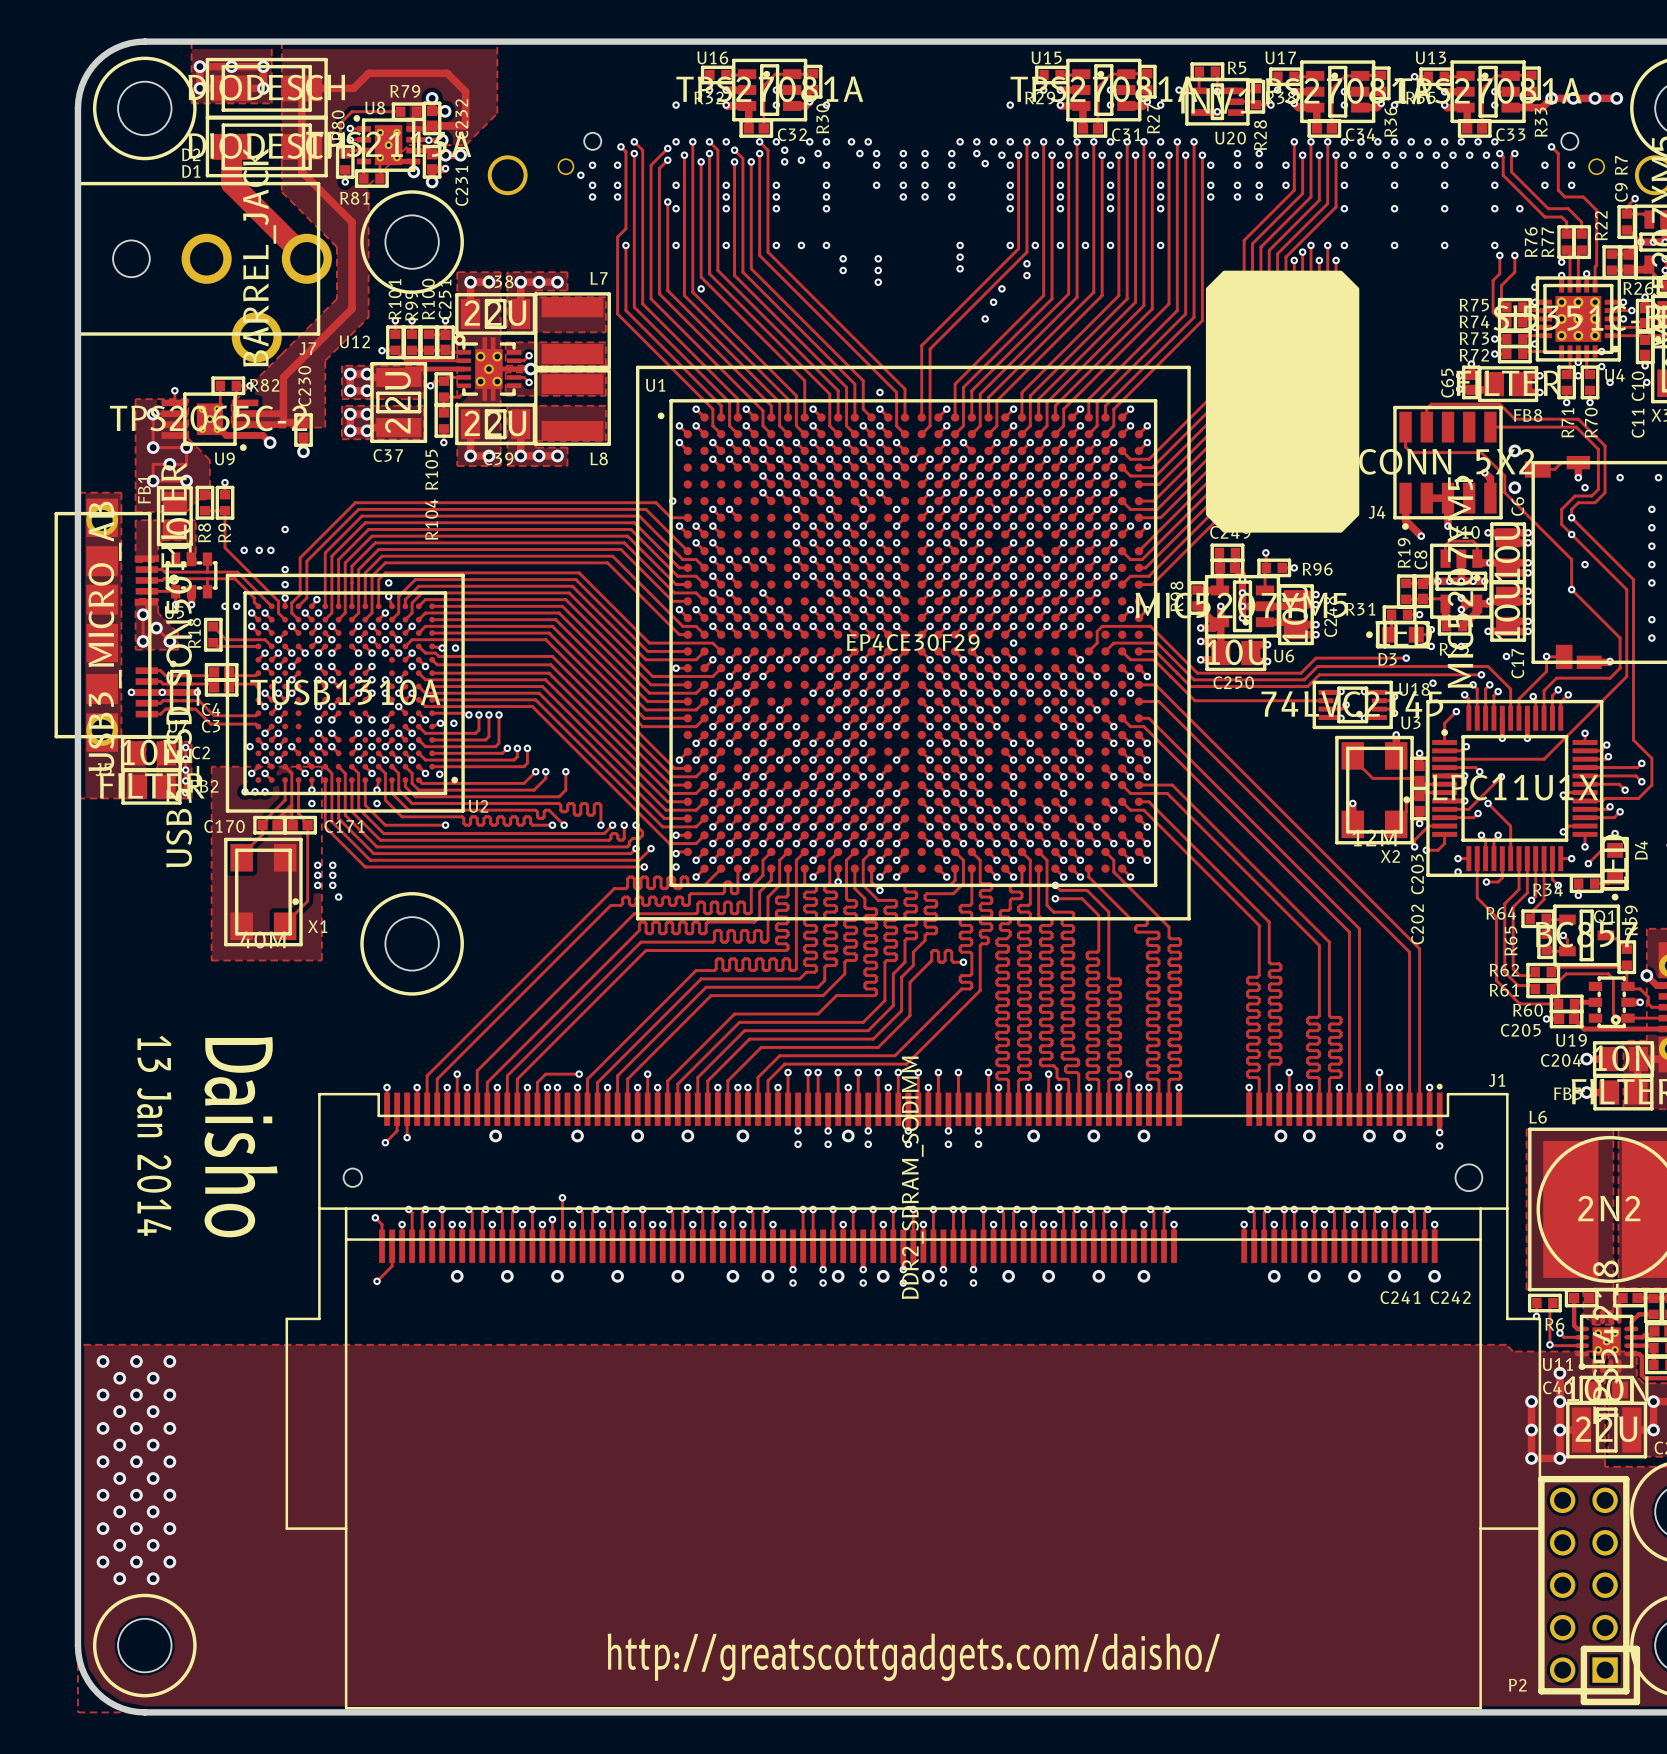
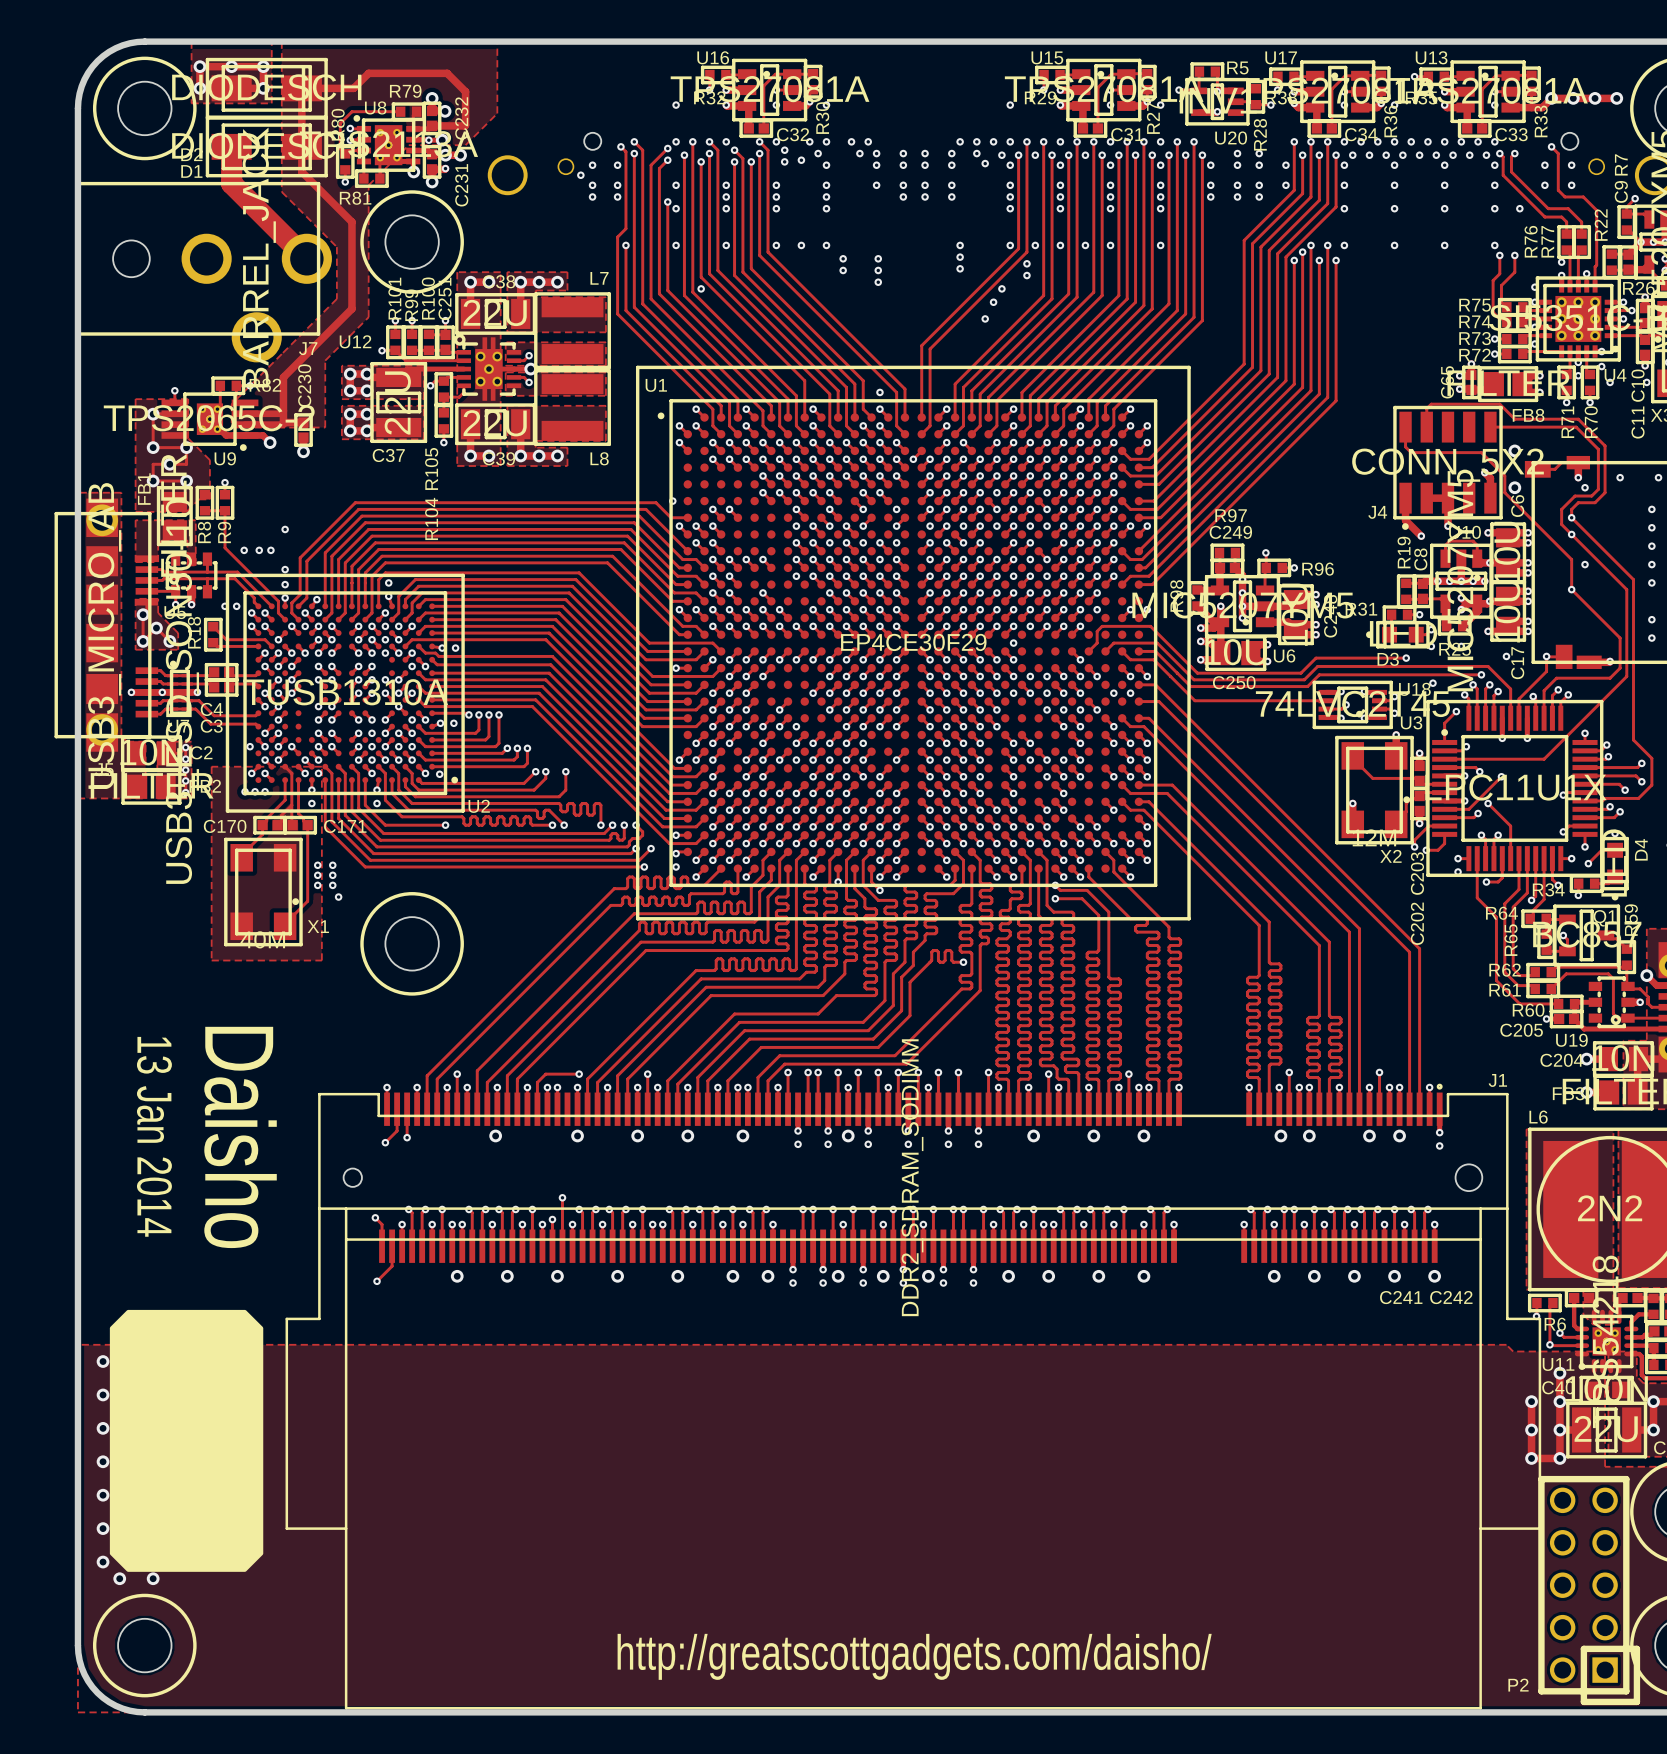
drawing: [1205, 270, 1360, 533] -> none
drawing: none -> [109, 1309, 264, 1572]

